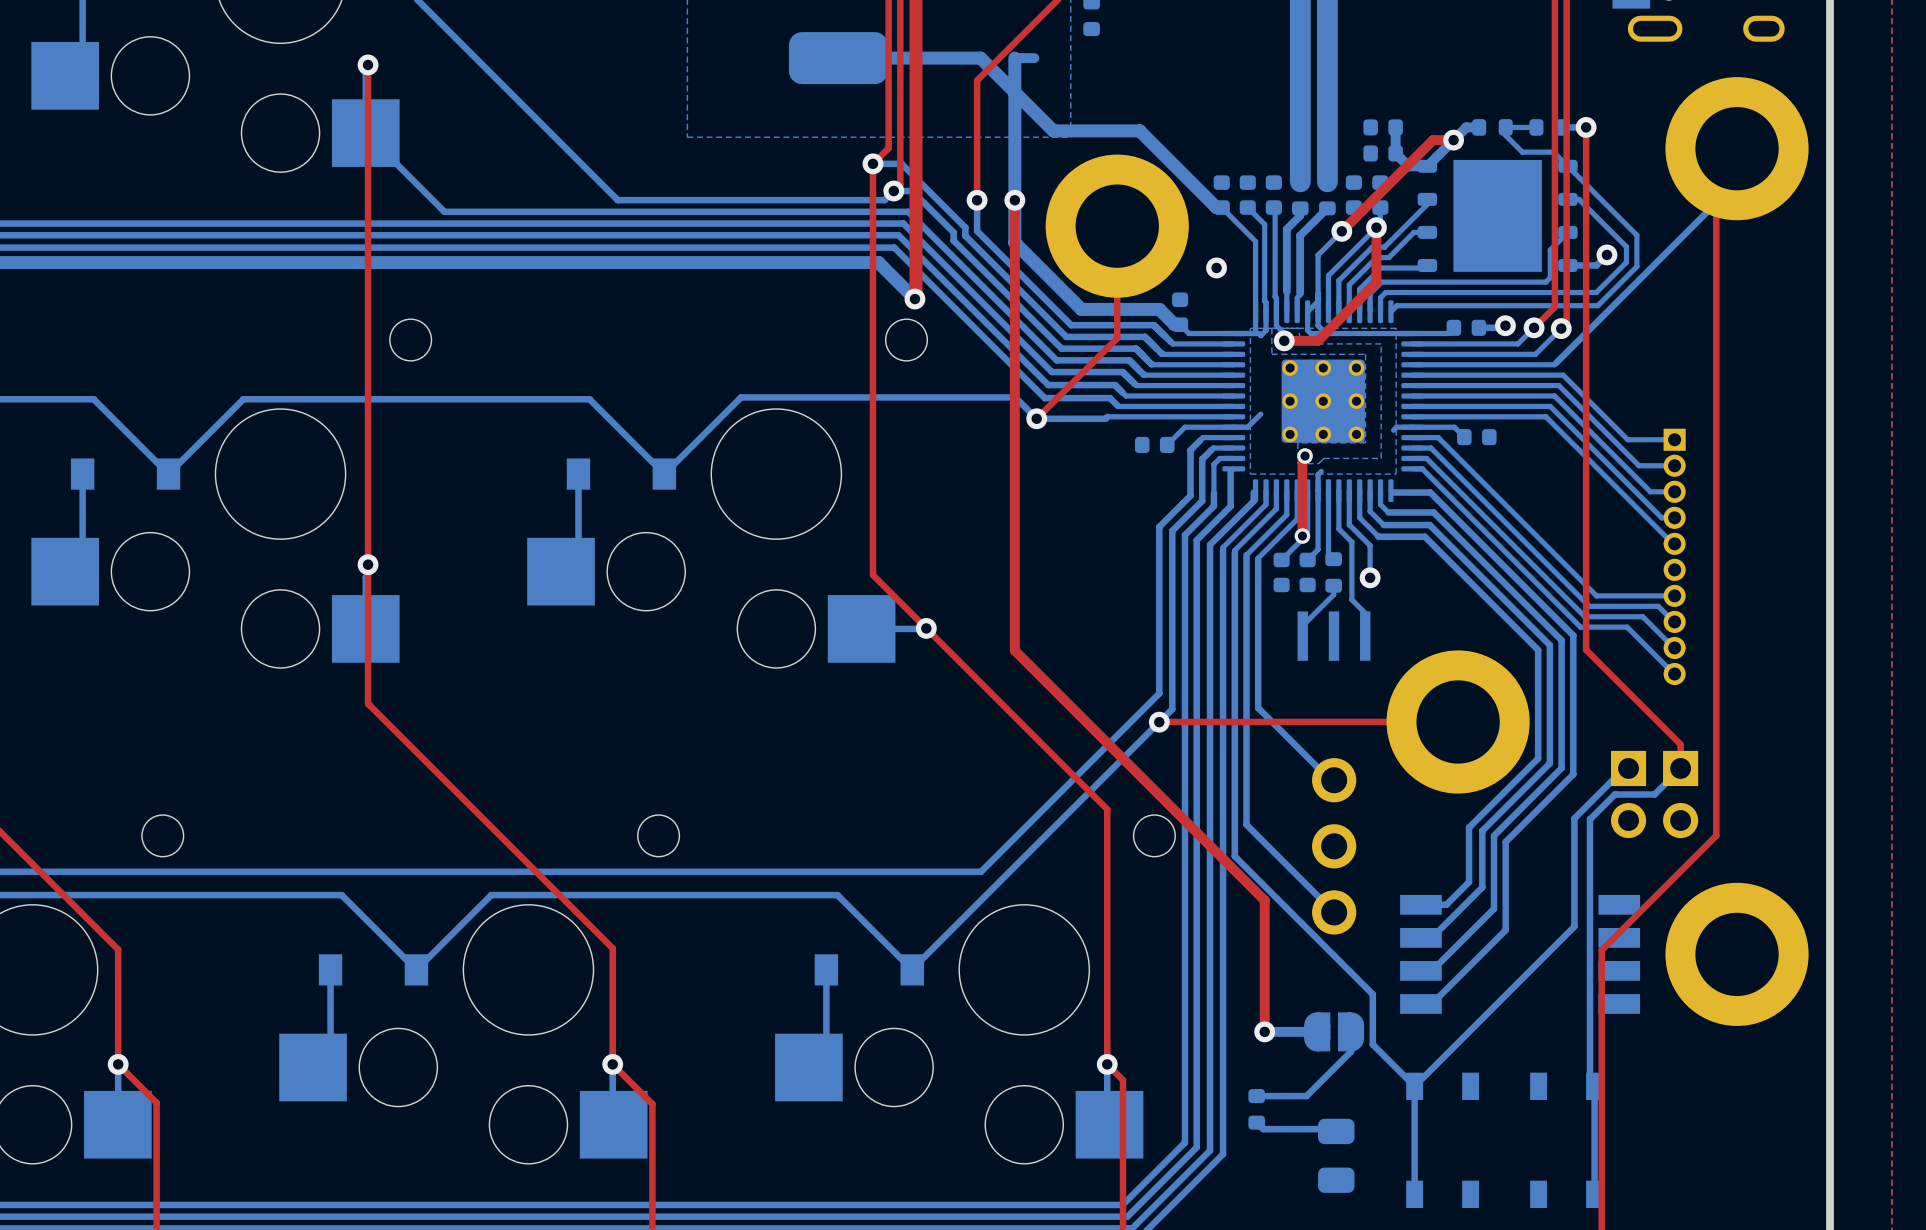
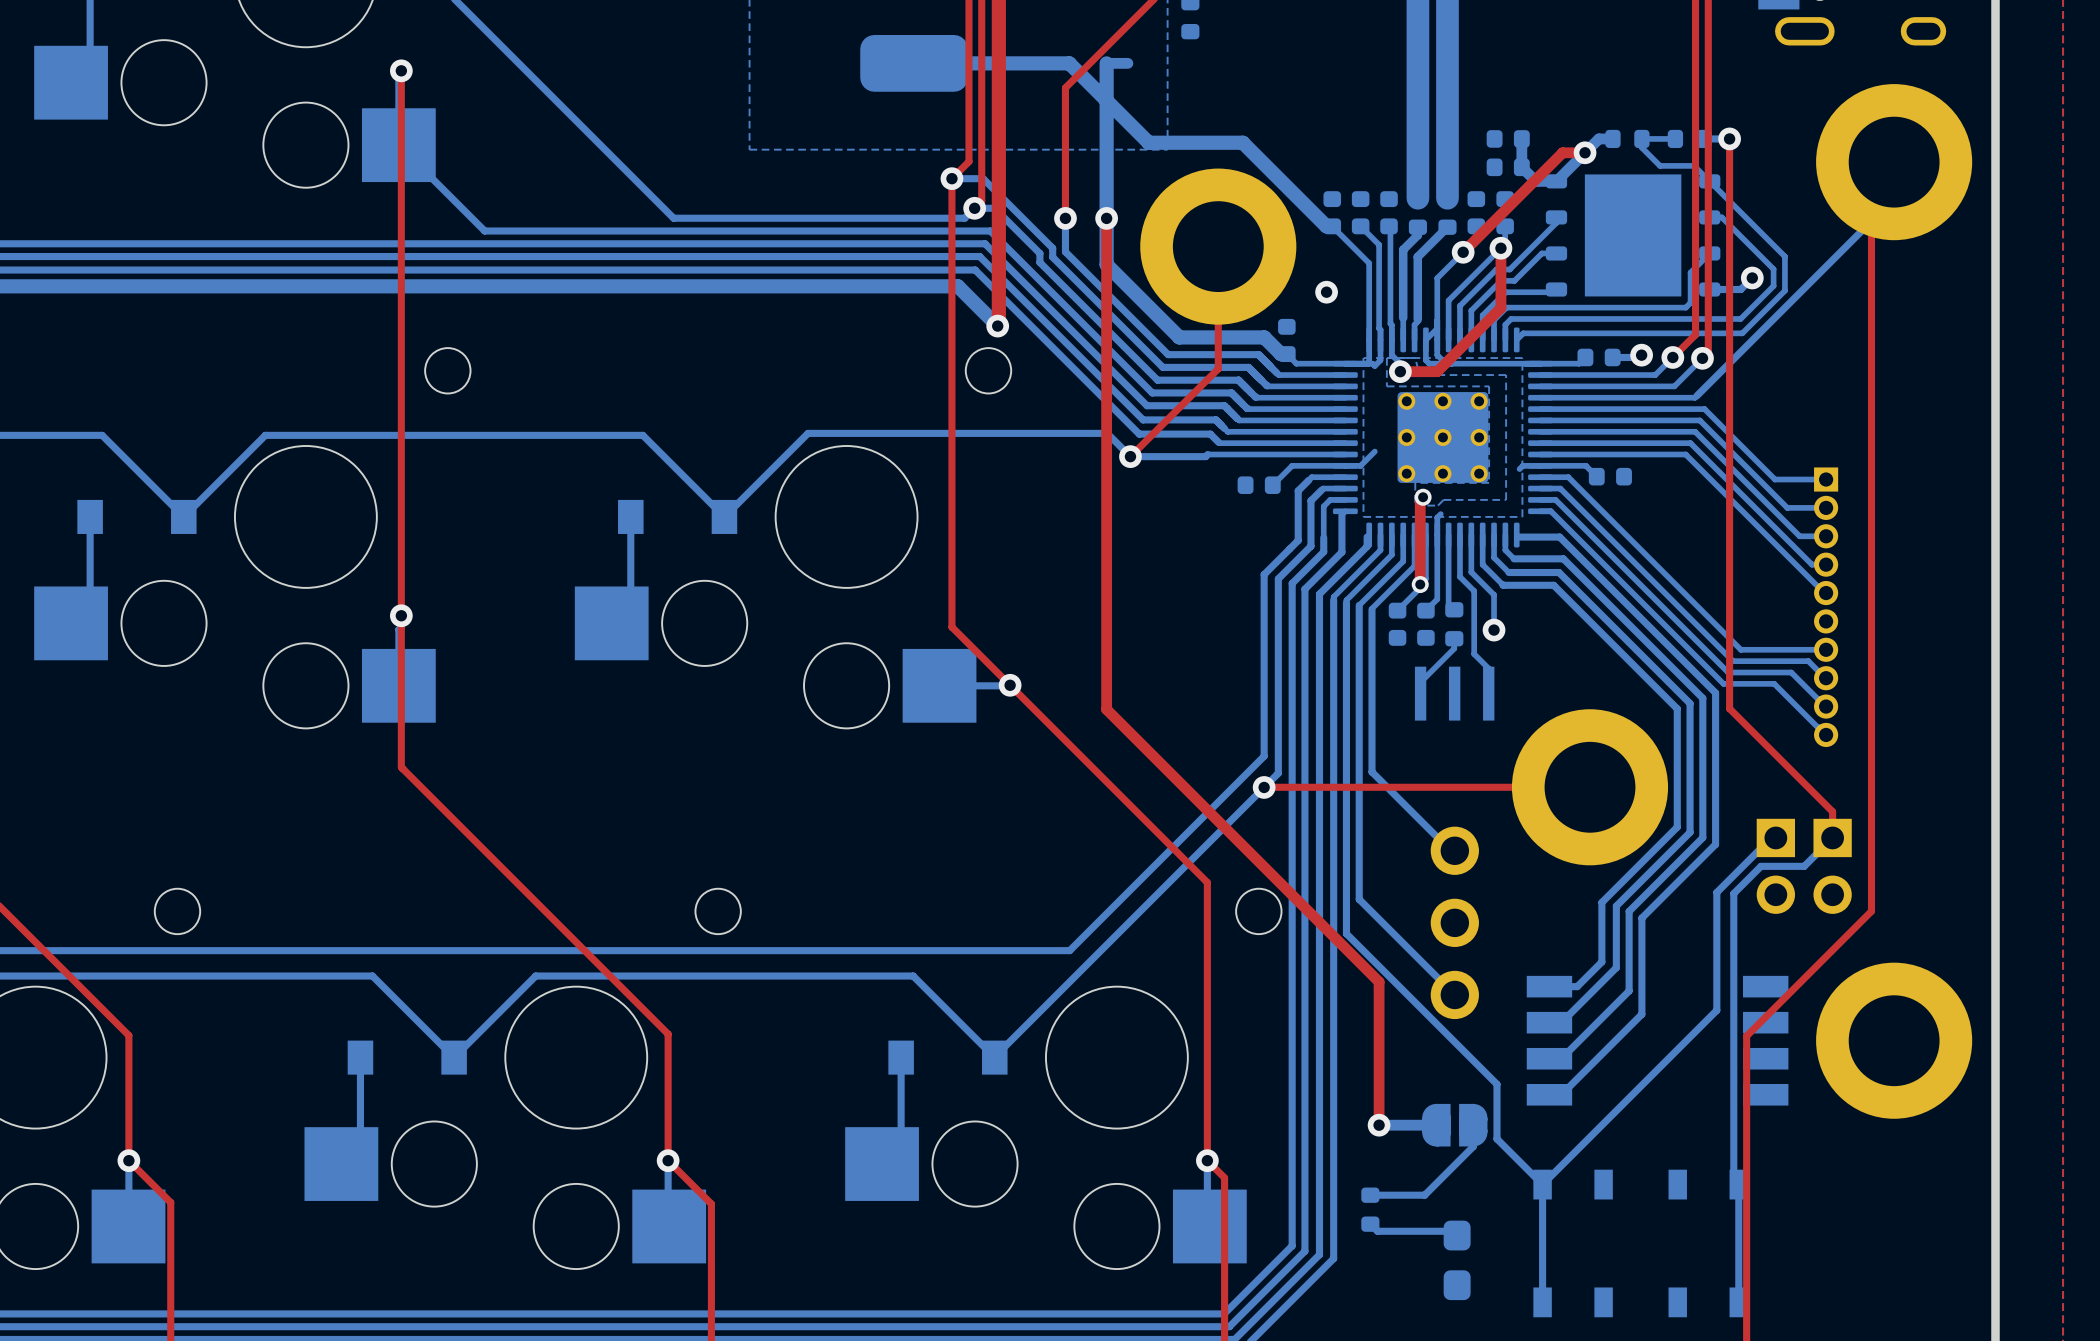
part footprint: [1318, 1118, 1355, 1193] -> [1443, 1220, 1471, 1301]

